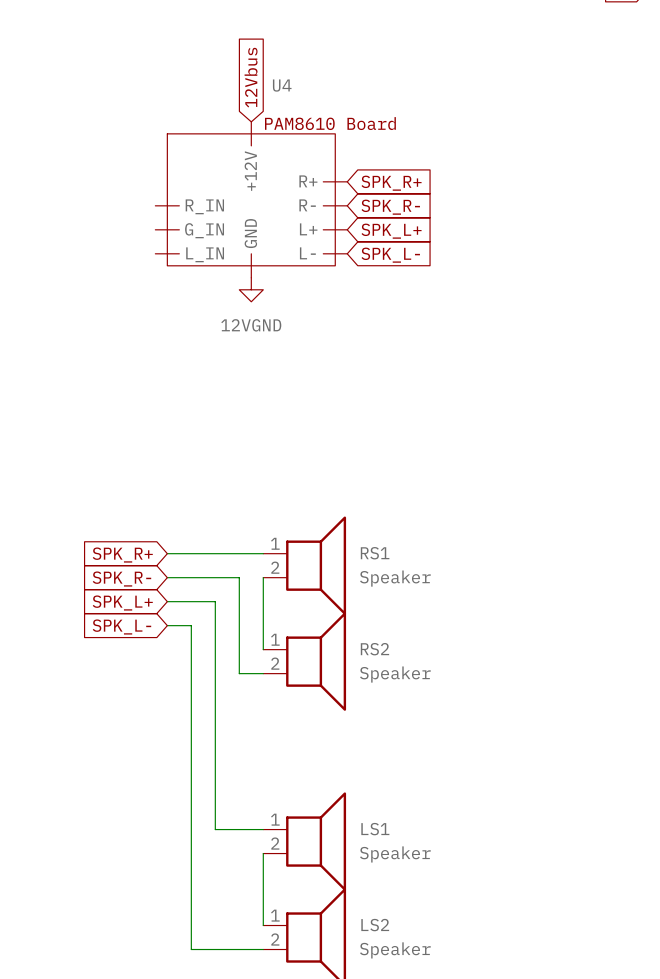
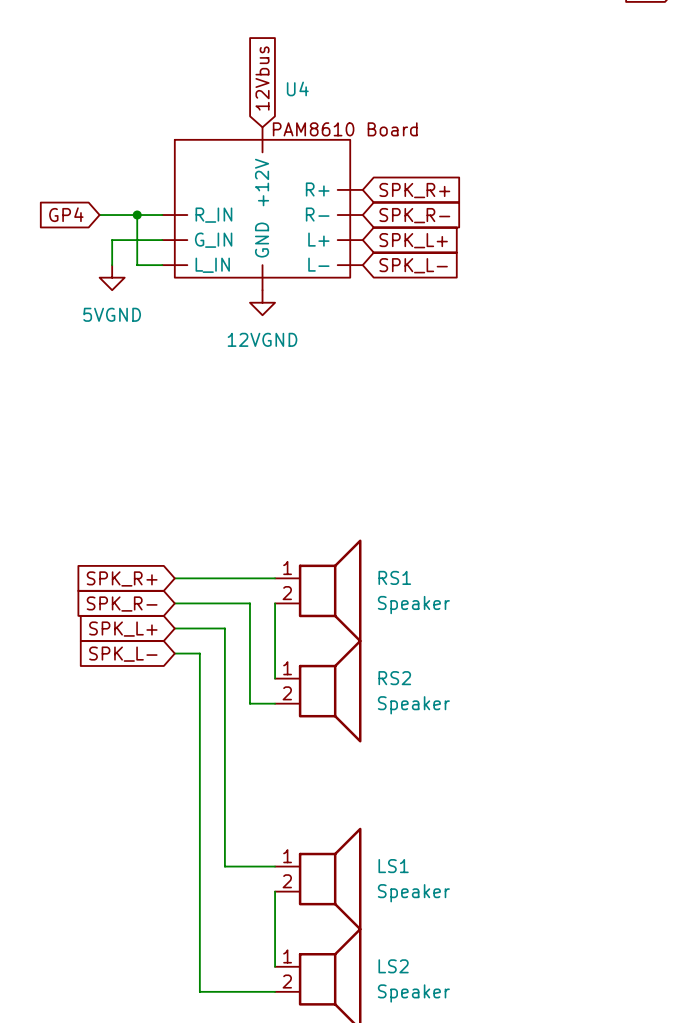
global label: none -> GP4 (66, 214)
wire: none -> (99, 215) (162, 215)
wire: none -> (137, 215) (137, 265) (162, 265)
junction: none -> (137, 215)
wire: none -> (162, 240) (112, 240) (112, 265)
power symbol: none -> 5VGND (112, 277)

